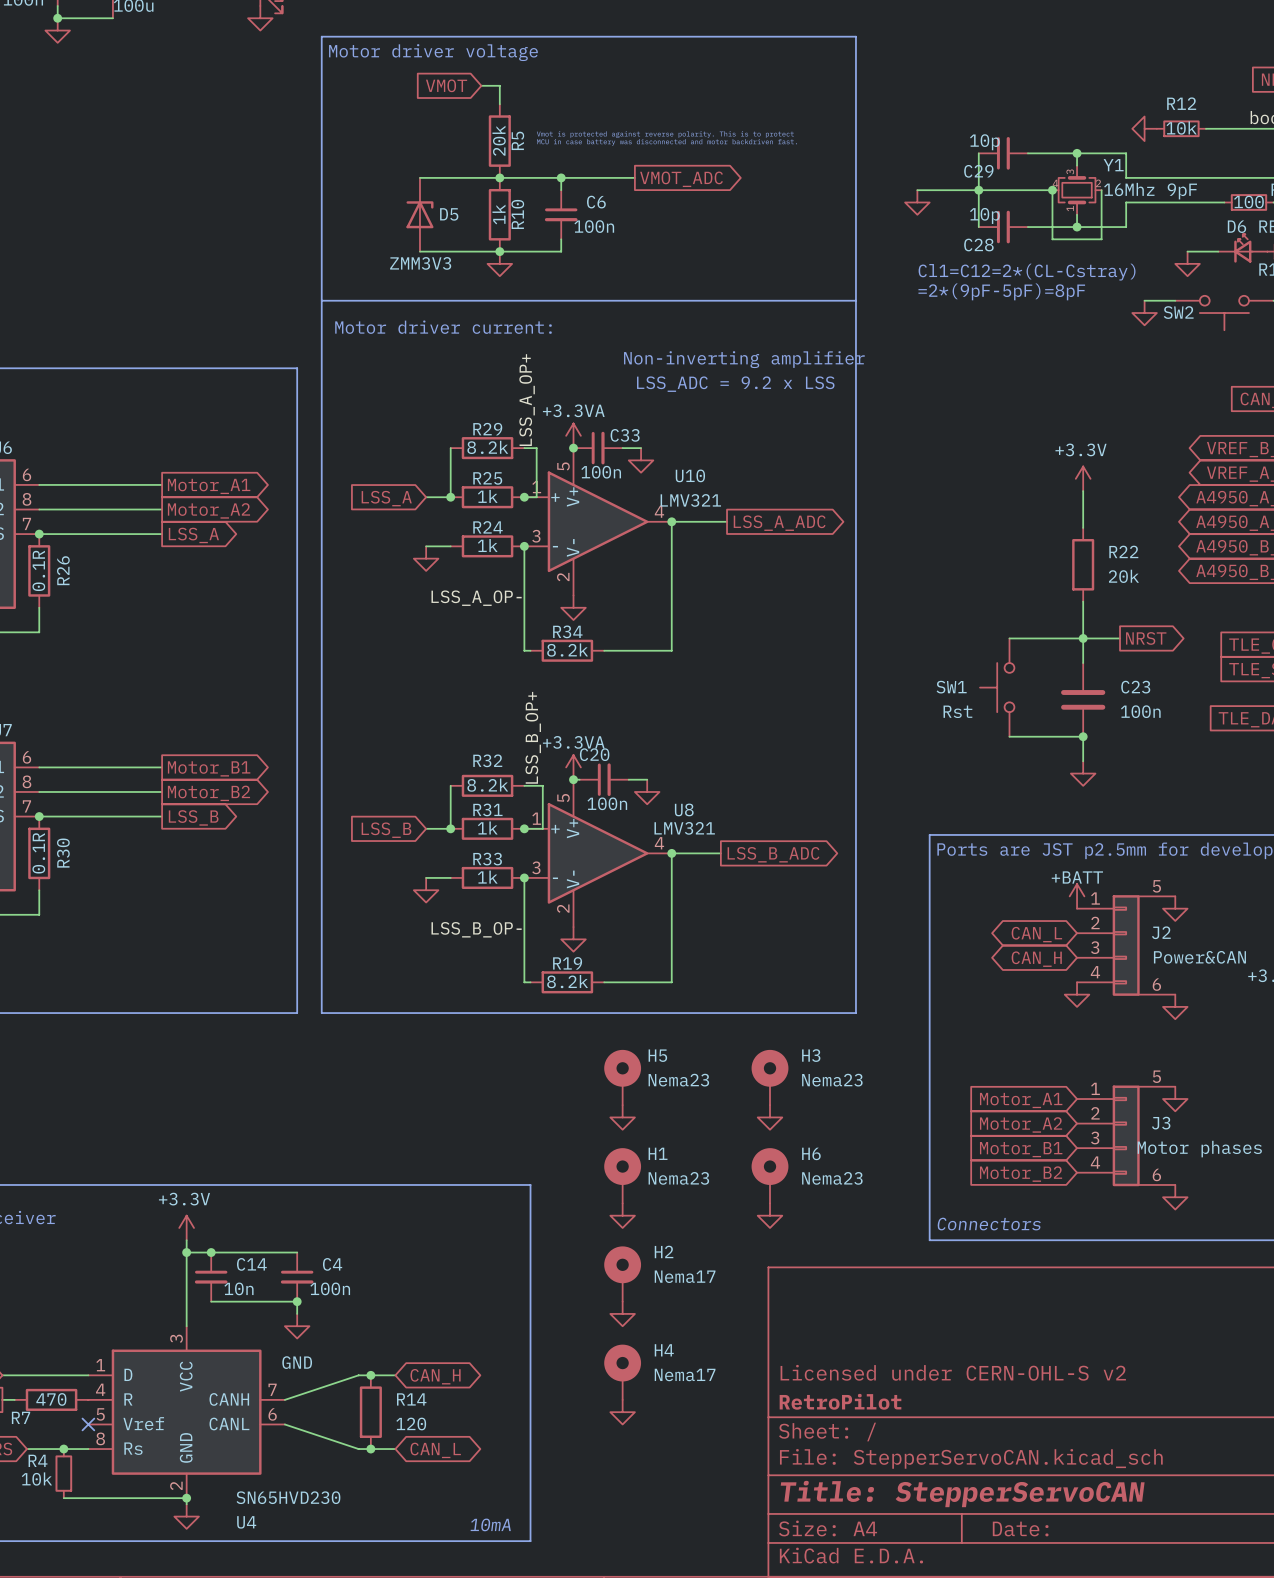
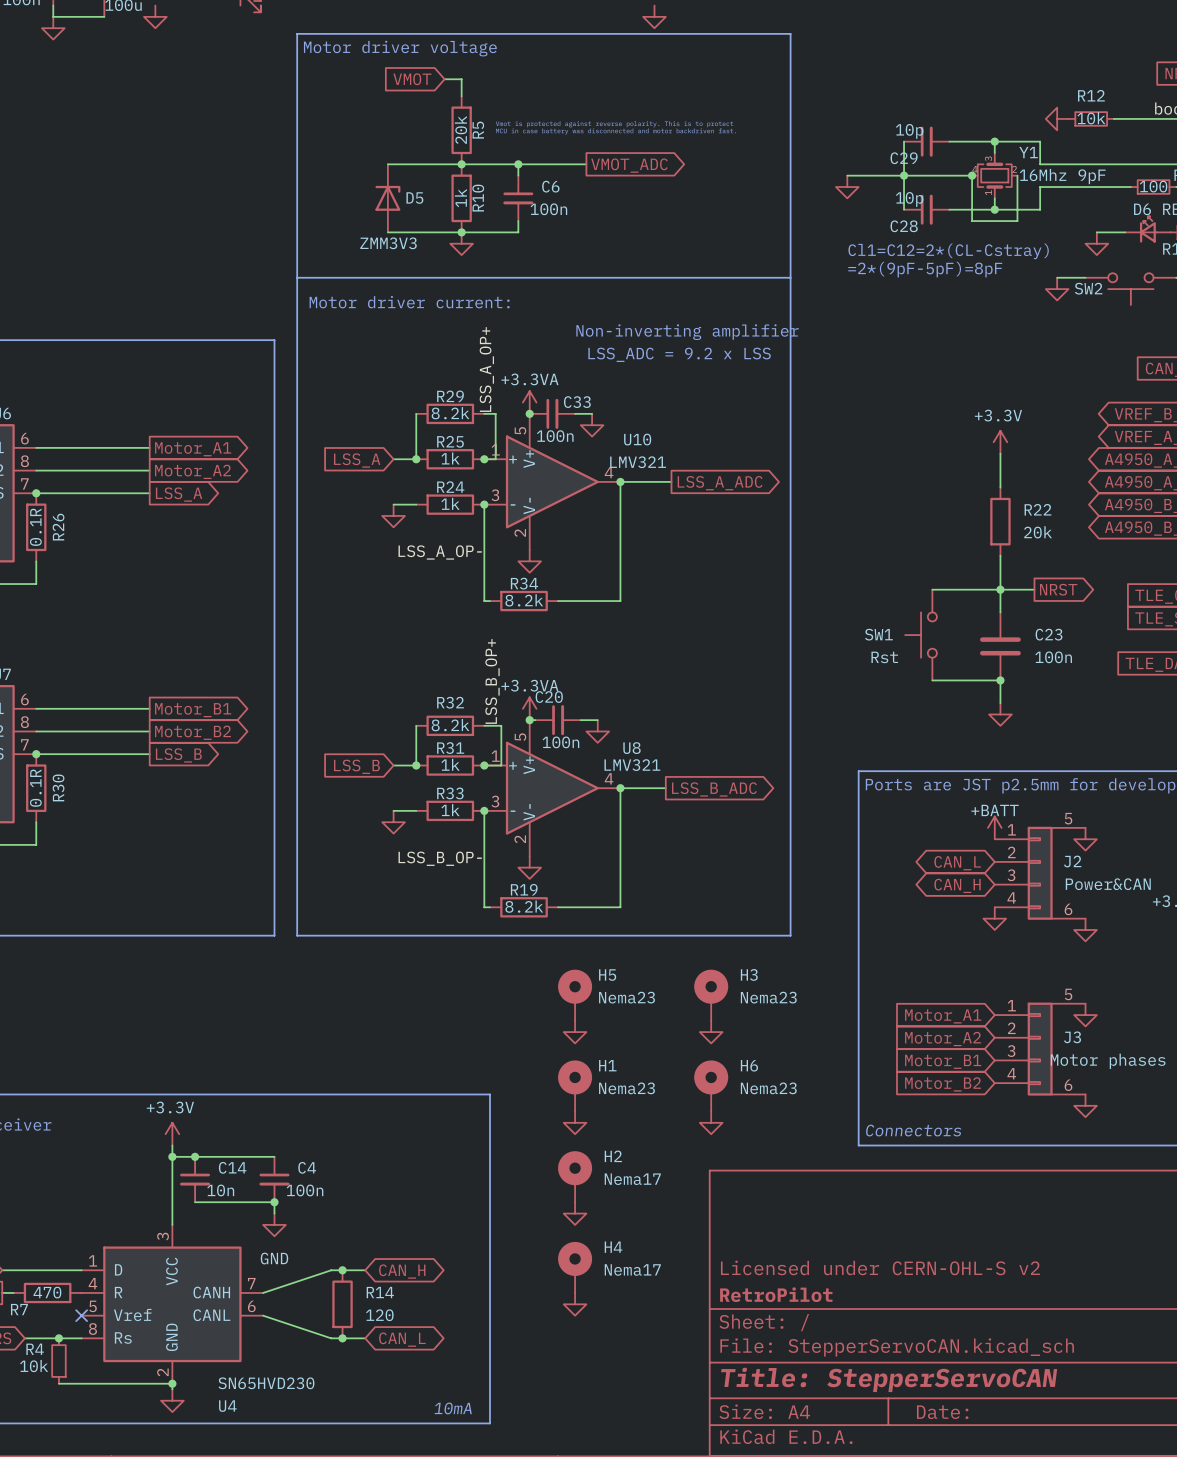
junction: (57, 18) -> none
power symbol: none -> (155, 16)
power symbol: (260, 18) -> none
power symbol: none -> (654, 16)

